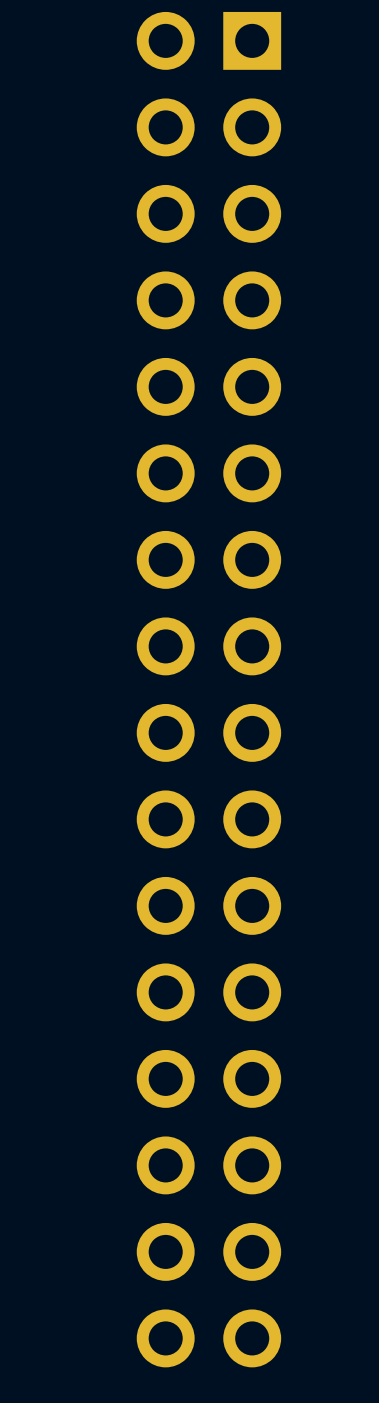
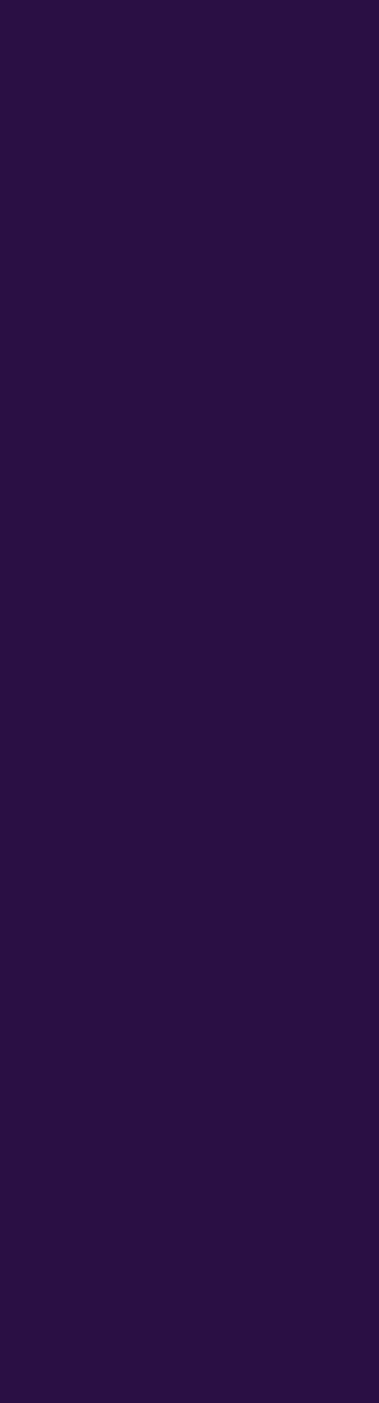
part: (208, 689) -> none

